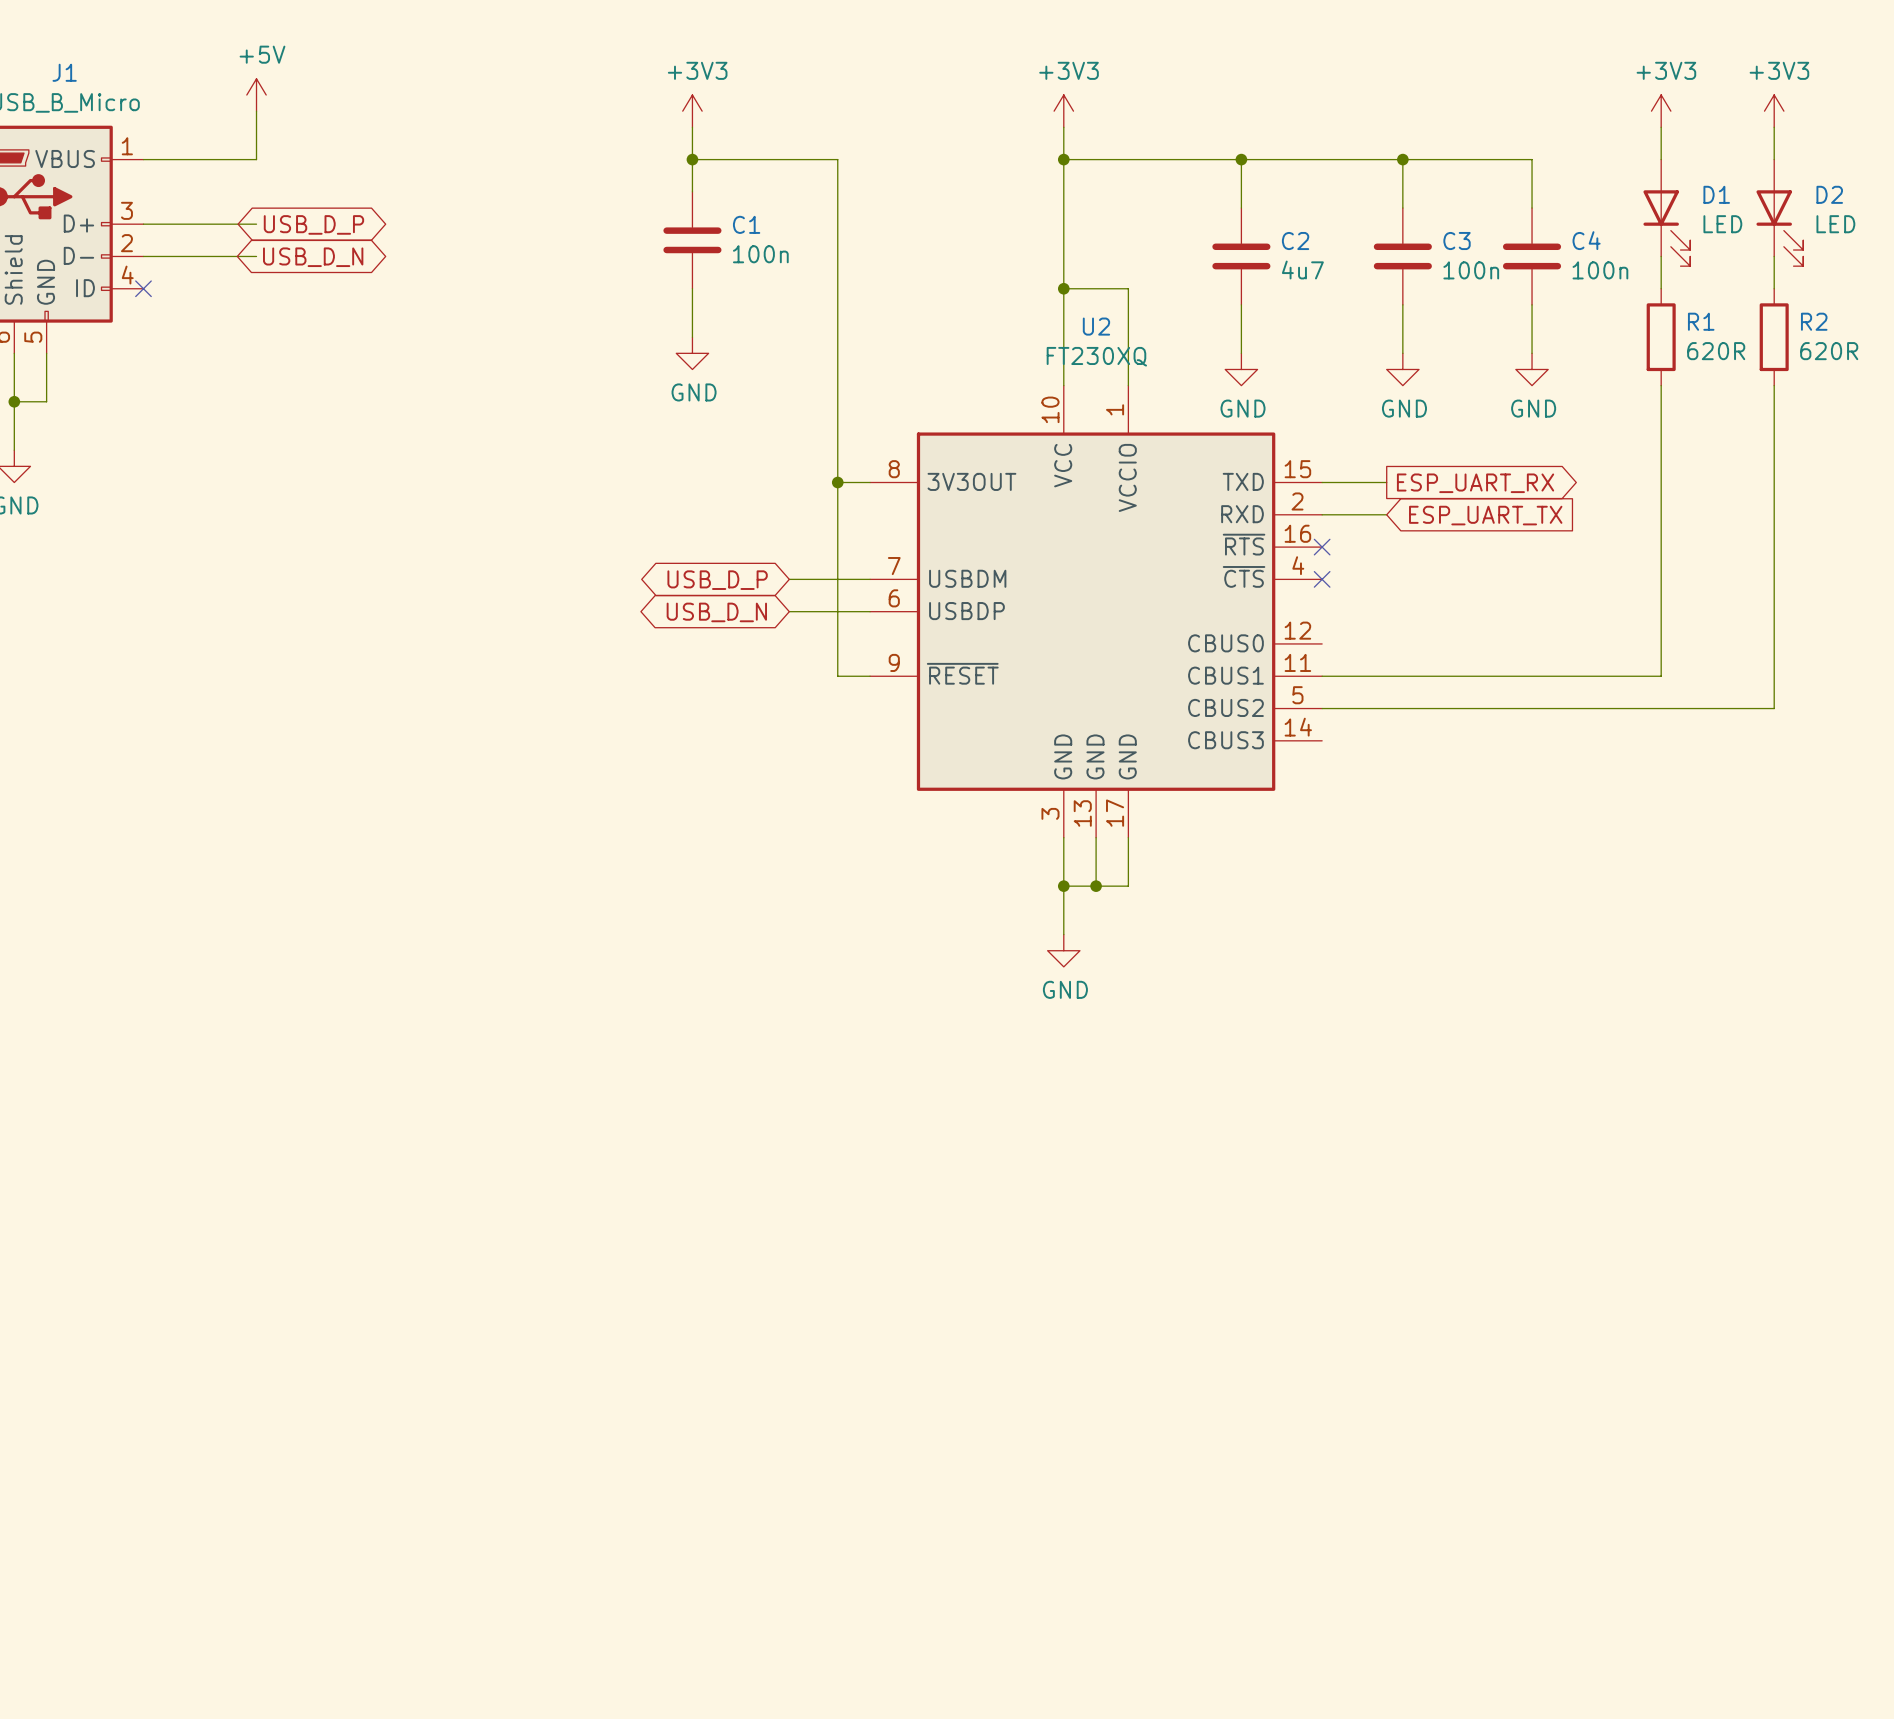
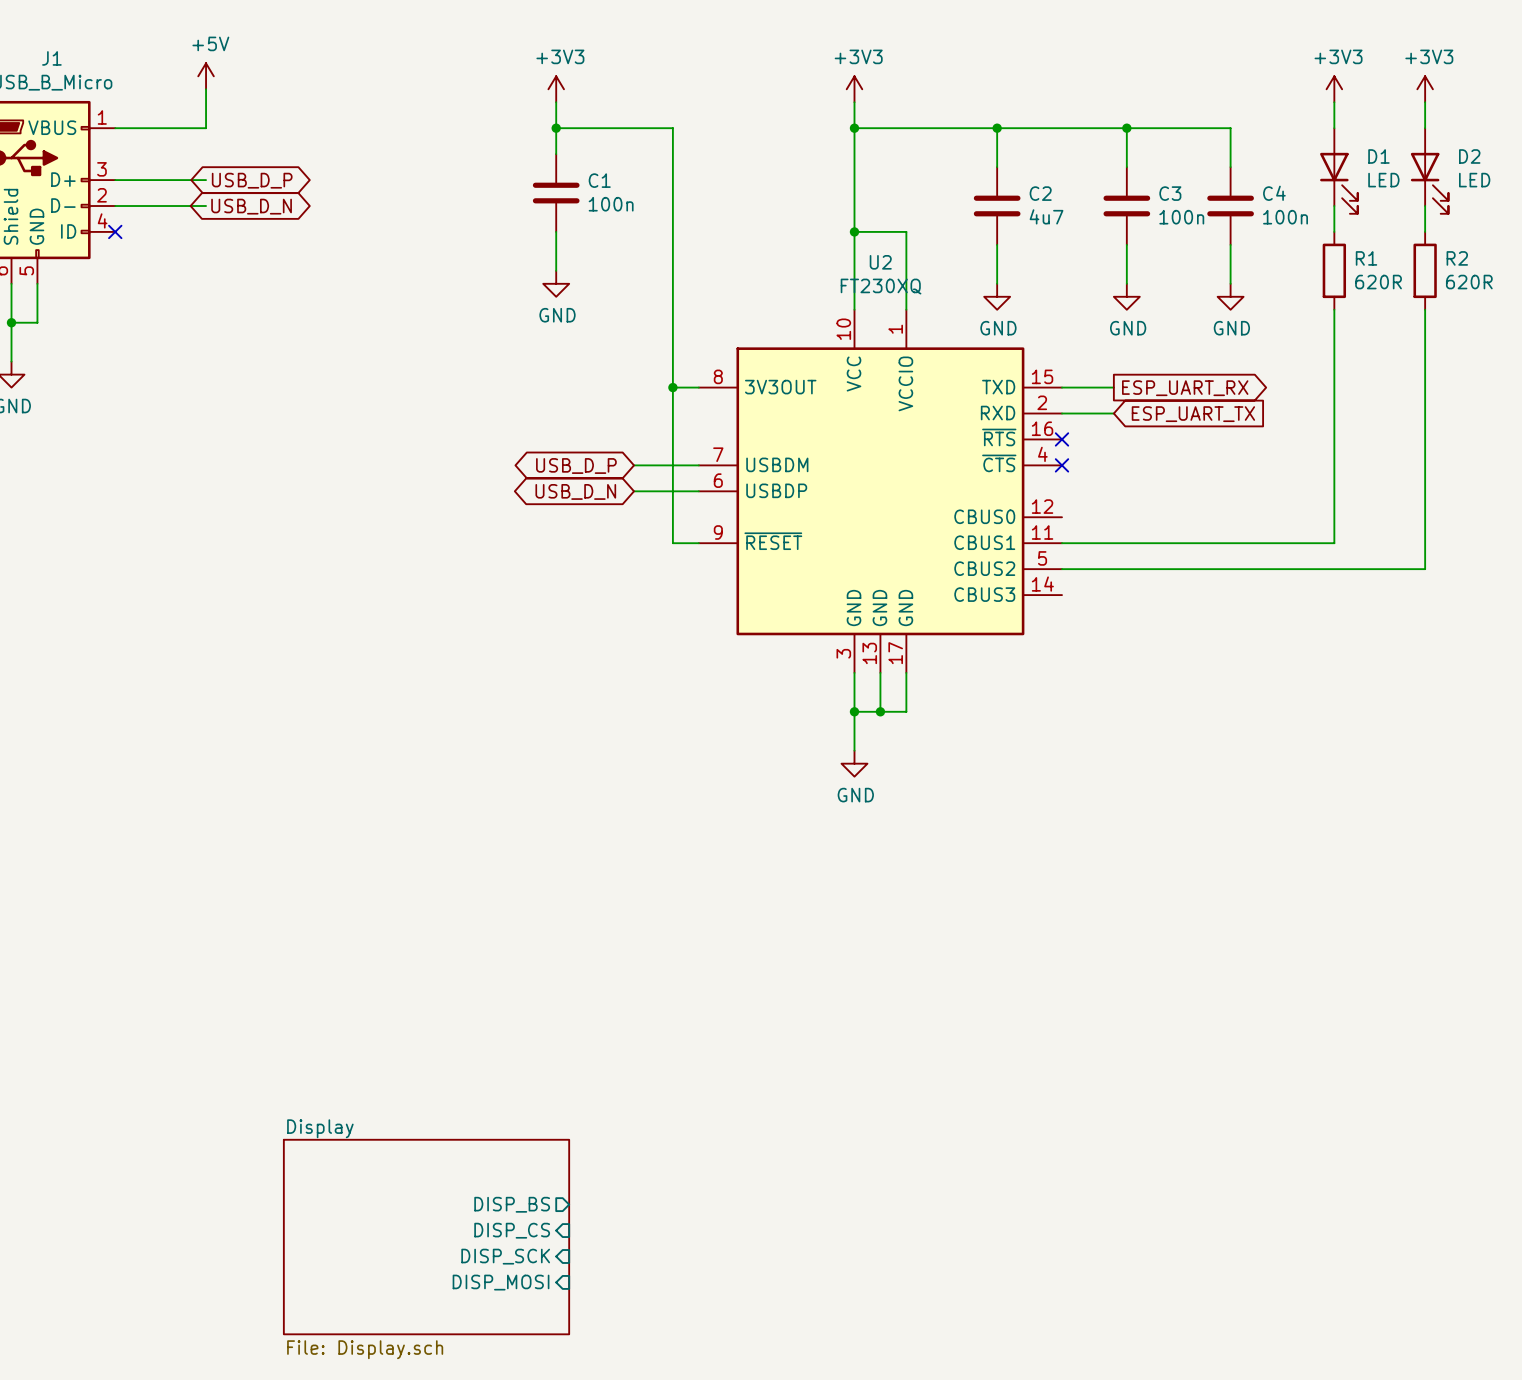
sheet pin: none -> DISP_BS (512, 1204)
sheet pin: none -> DISP_CS (512, 1230)
sheet Display: none -> File: Display.sch (426, 1237)
sheet pin: none -> DISP_SCK (505, 1256)
sheet pin: none -> DISP_MOSI (501, 1282)

